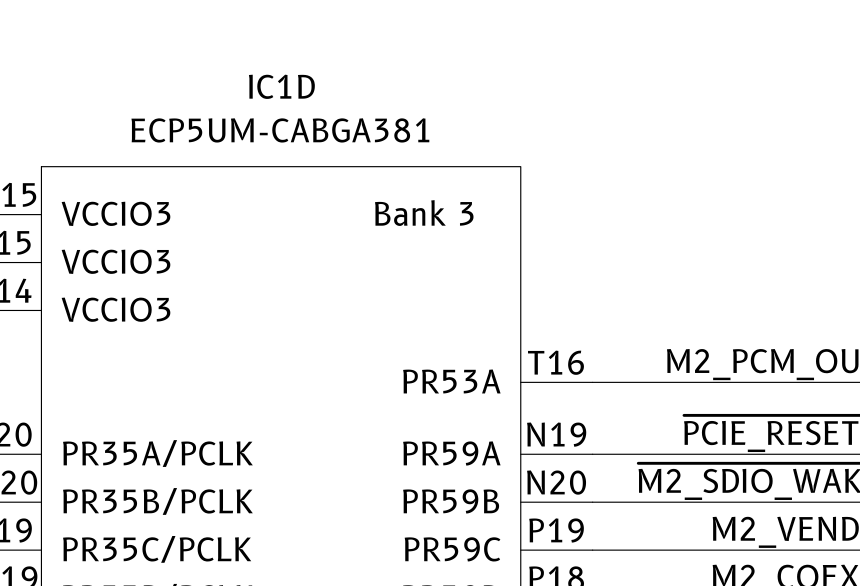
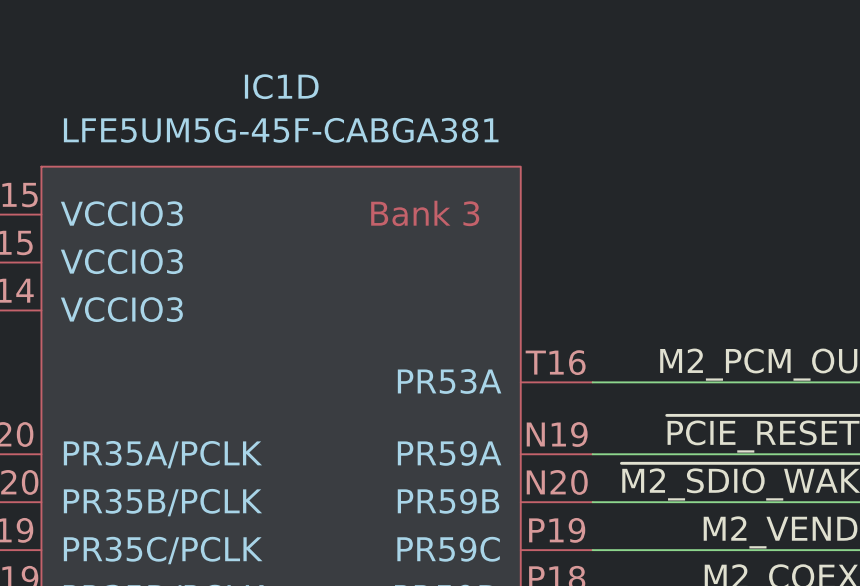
IC1D value: ECP5UM-CABGA381 (280, 130) -> LFE5UM5G-45F-CABGA381 (281, 130)

